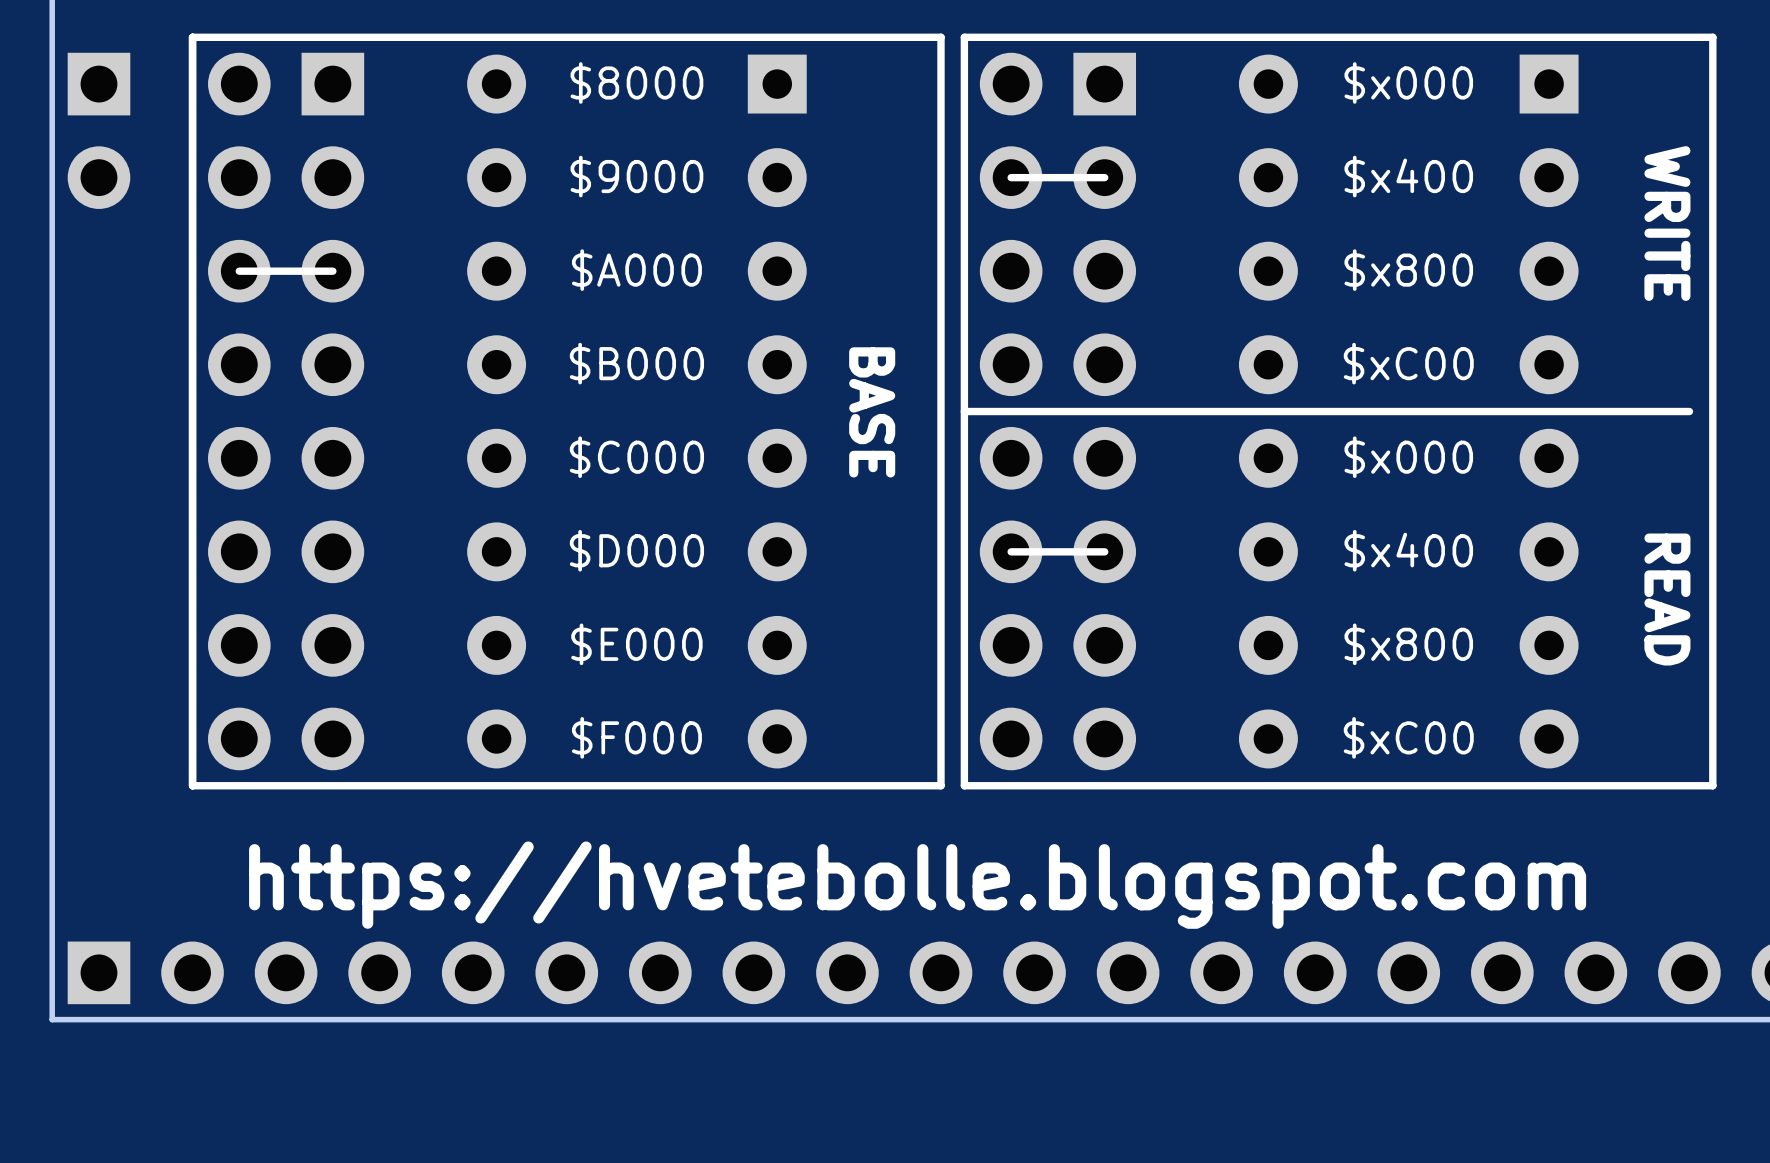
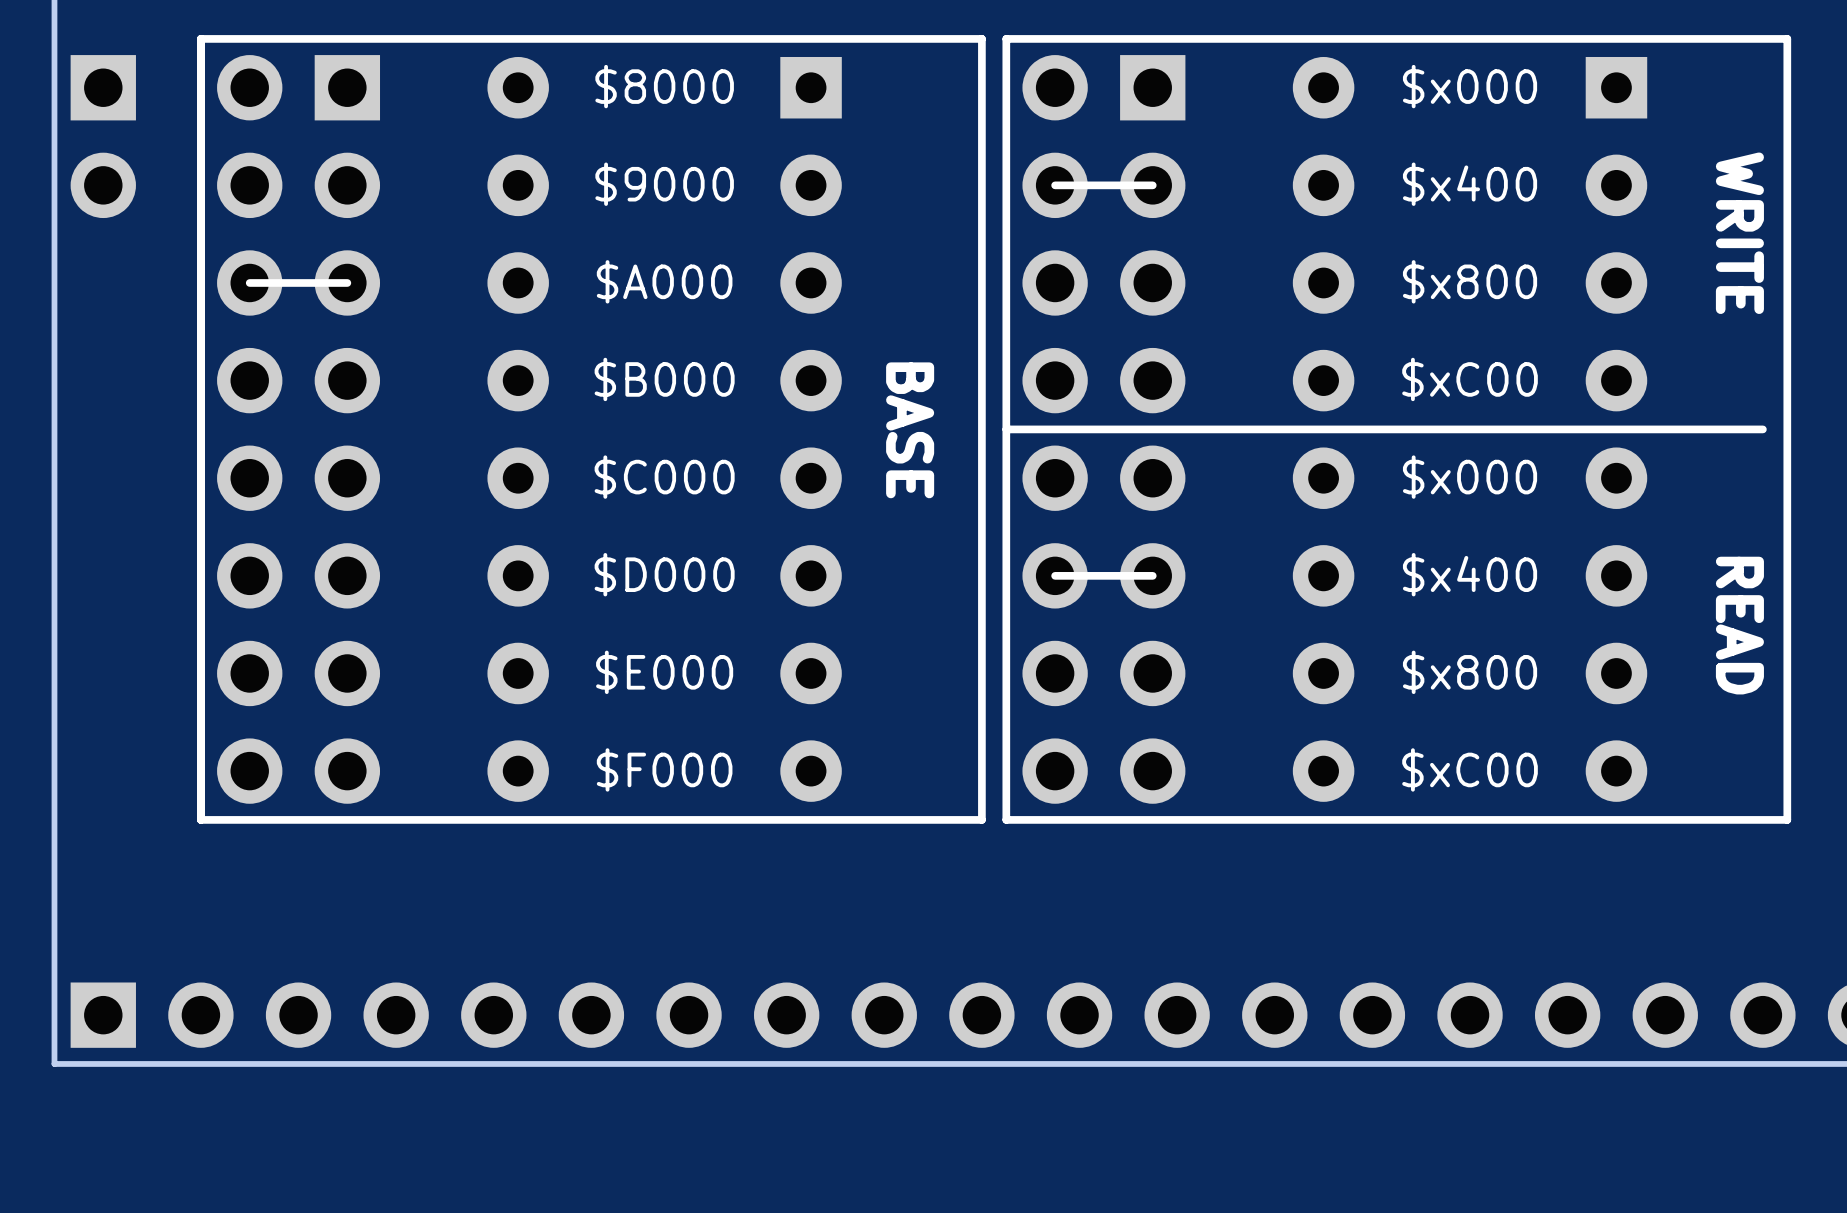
text: https://hvetebolle.blogspot.com (917, 885) -> none

